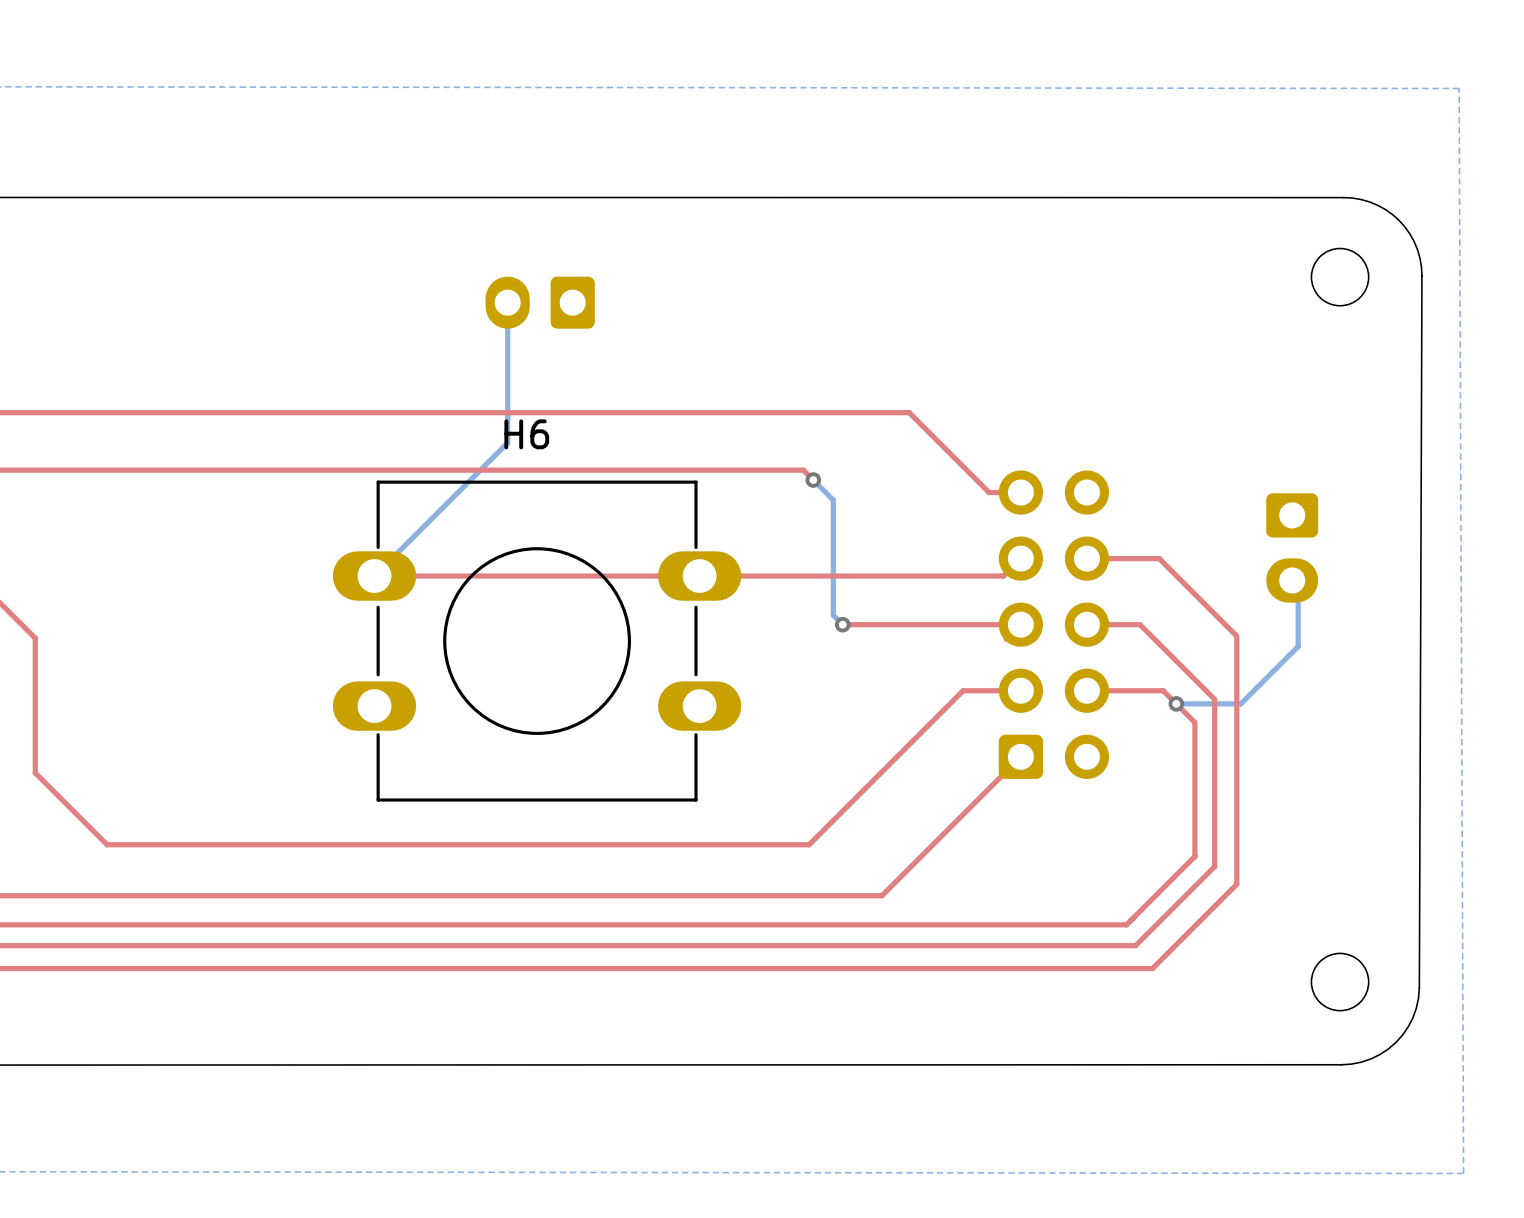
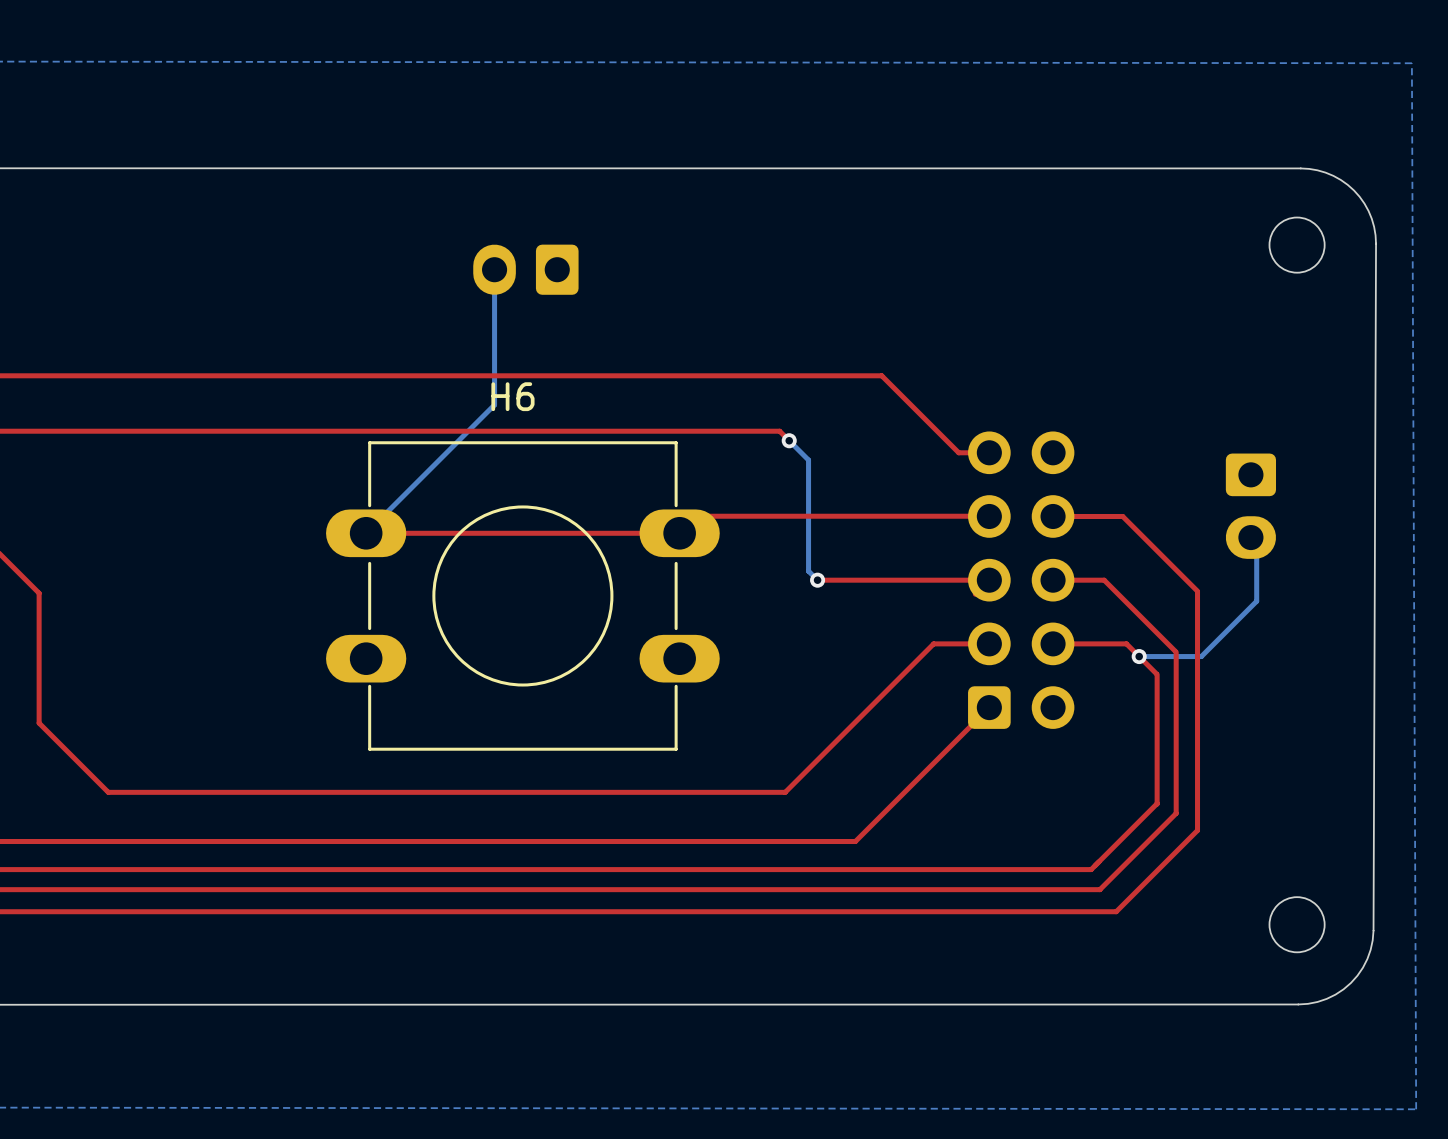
top track: (1020, 558) (1003, 576) (699, 576) -> (989, 516) (696, 516) (679, 533)

